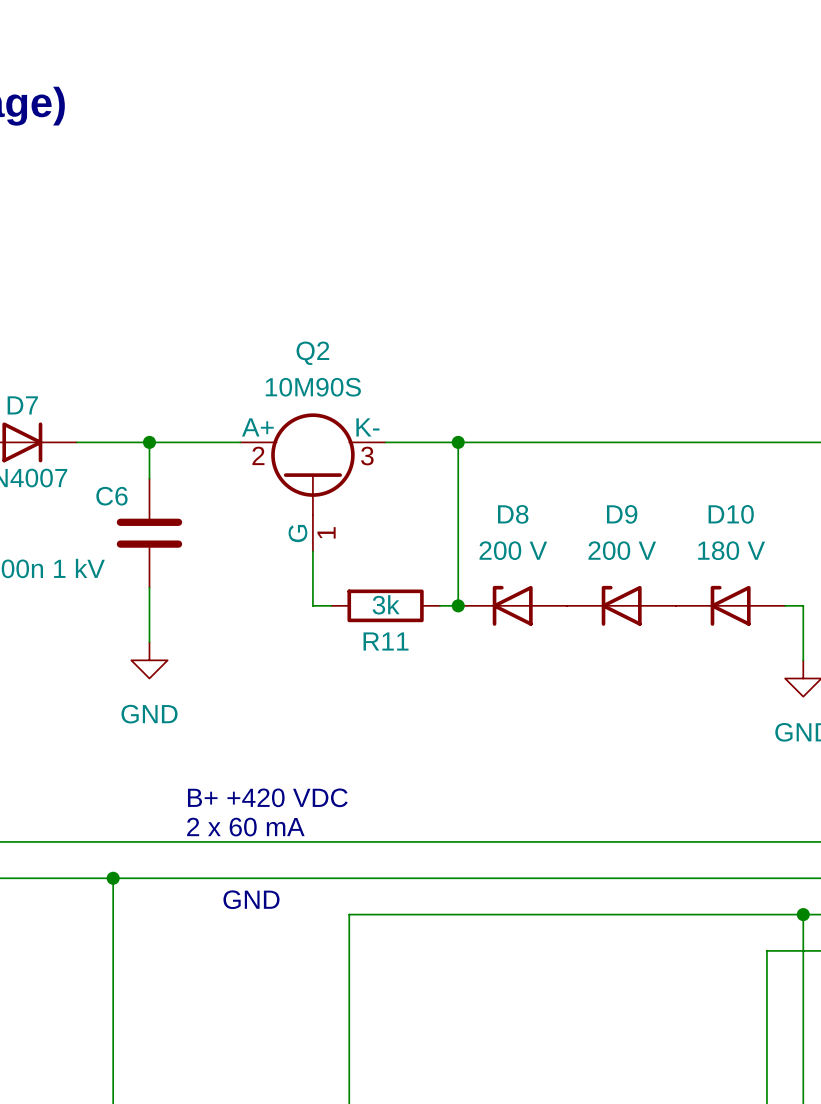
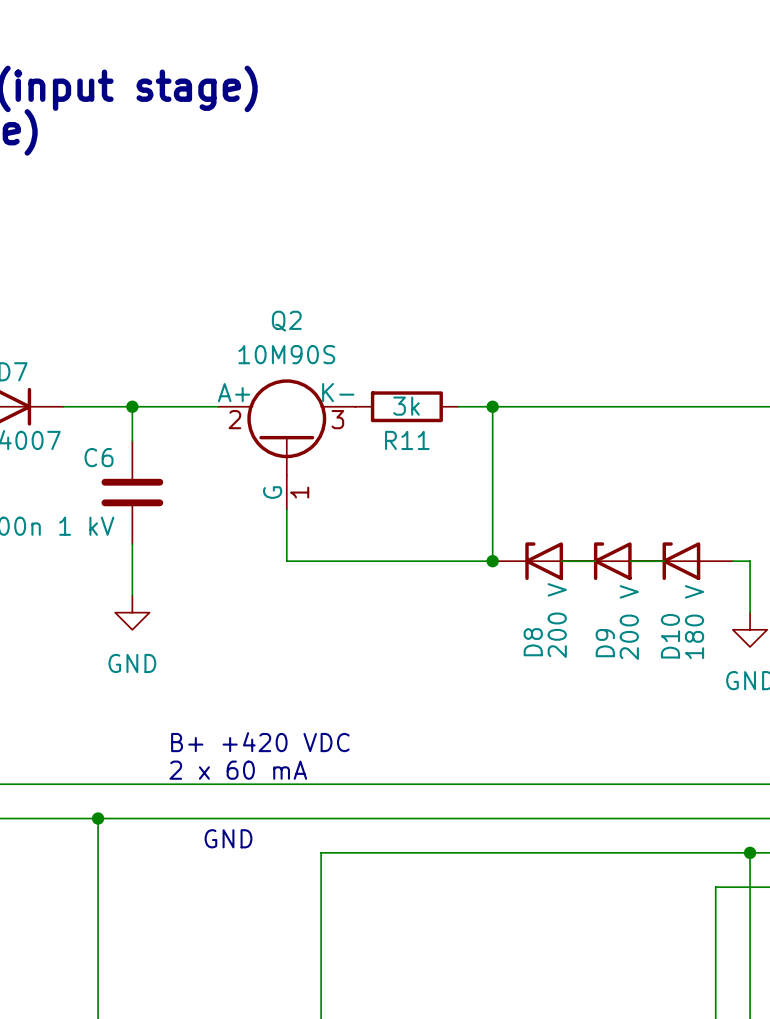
wire: (385, 442) (494, 442) -> (303, 561) (406, 561)
wire: (458, 442) (458, 605) -> (492, 406) (492, 561) (424, 561)
junction position: (458, 442) -> (492, 406)
D8 name rotation: 0° (513, 514) -> 90° counterclockwise (533, 642)
D8 name position: D8 (513, 514) -> D8 (533, 642)
D9 name rotation: 0° (622, 514) -> 90° counterclockwise (605, 643)
D9 name position: D9 (622, 514) -> D9 (605, 643)
D10 name rotation: 0° (731, 514) -> 90° counterclockwise (670, 636)
D10 name position: D10 (731, 514) -> D10 (670, 636)
D8 value rotation: 0° (513, 550) -> 90° counterclockwise (557, 620)
D8 value position: 200 V (513, 550) -> 200 V (557, 620)
D9 value rotation: 0° (622, 550) -> 90° counterclockwise (629, 622)
D9 value position: 200 V (622, 550) -> 200 V (629, 622)
D10 value rotation: 0° (731, 550) -> 90° counterclockwise (694, 622)
D10 value position: 180 V (731, 550) -> 180 V (694, 622)
R11 position: (385, 605) -> (406, 406)
junction position: (458, 605) -> (492, 561)
D8 position: (512, 605) -> (544, 561)
D9 position: (621, 605) -> (612, 561)

